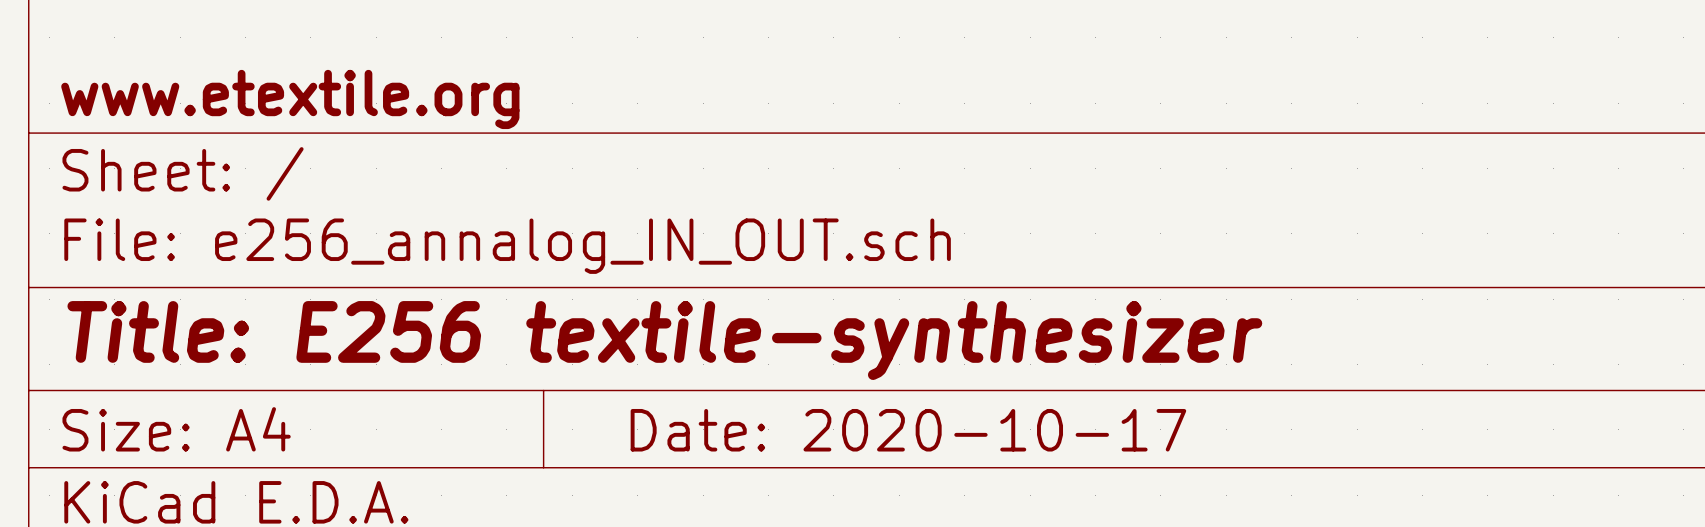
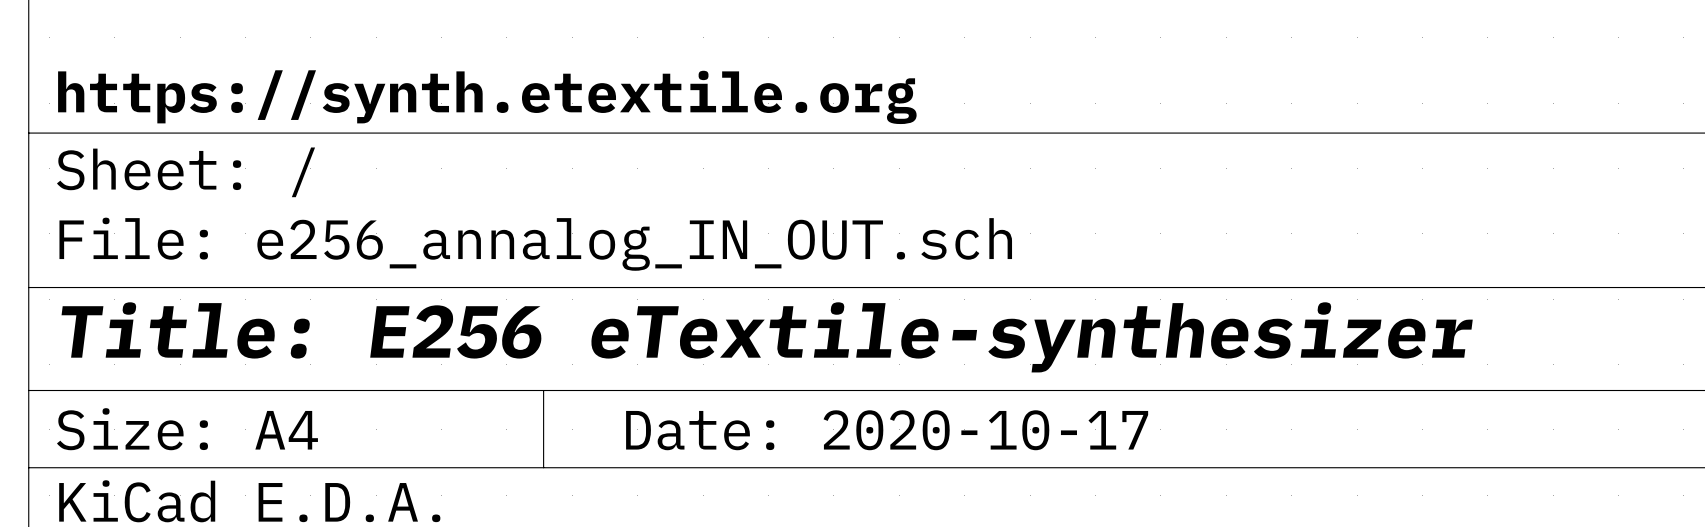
title block: www.etextile.org (290, 99) -> https://synth.etextile.org (487, 97)
title block: Title: E256 textile-synthesizer (664, 340) -> Title: E256 eTextile-synthesizer (767, 337)

